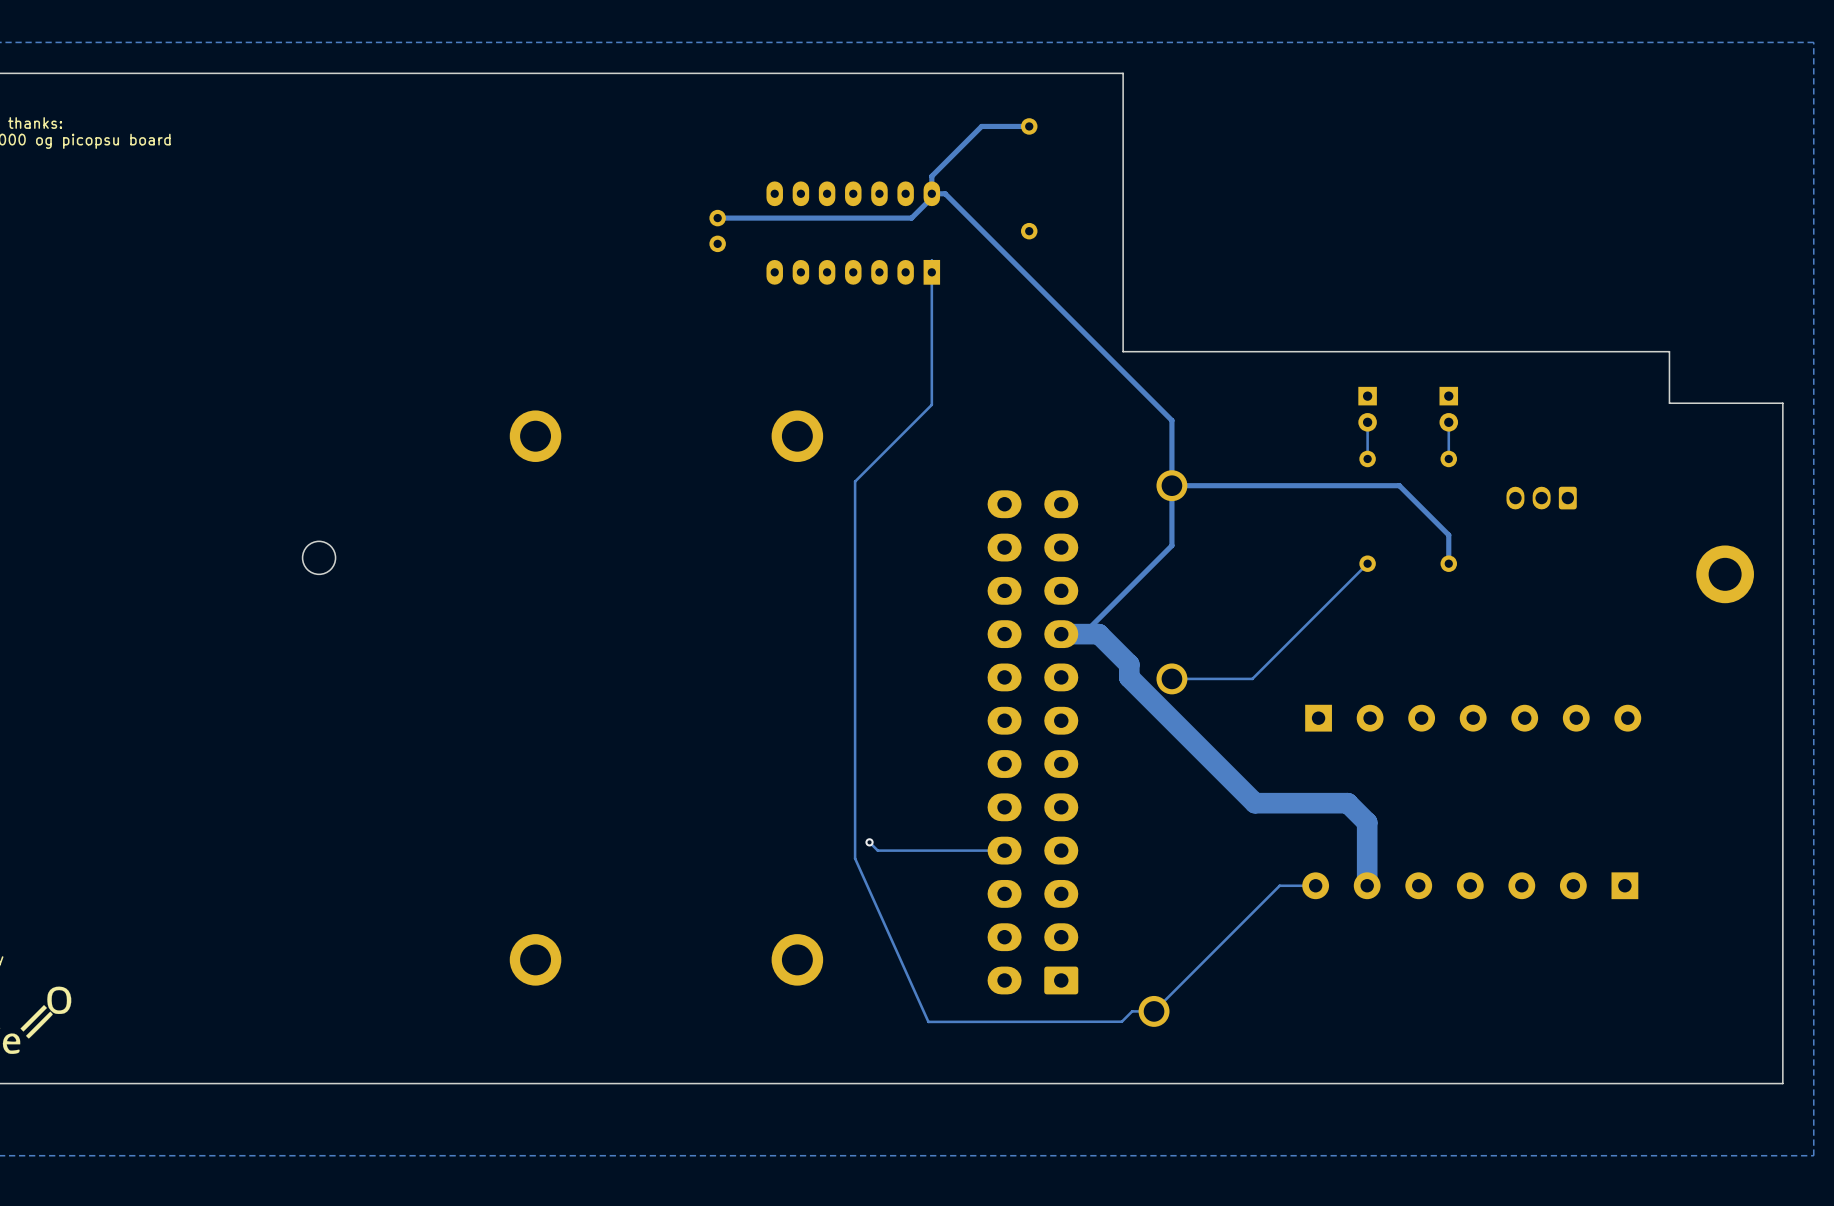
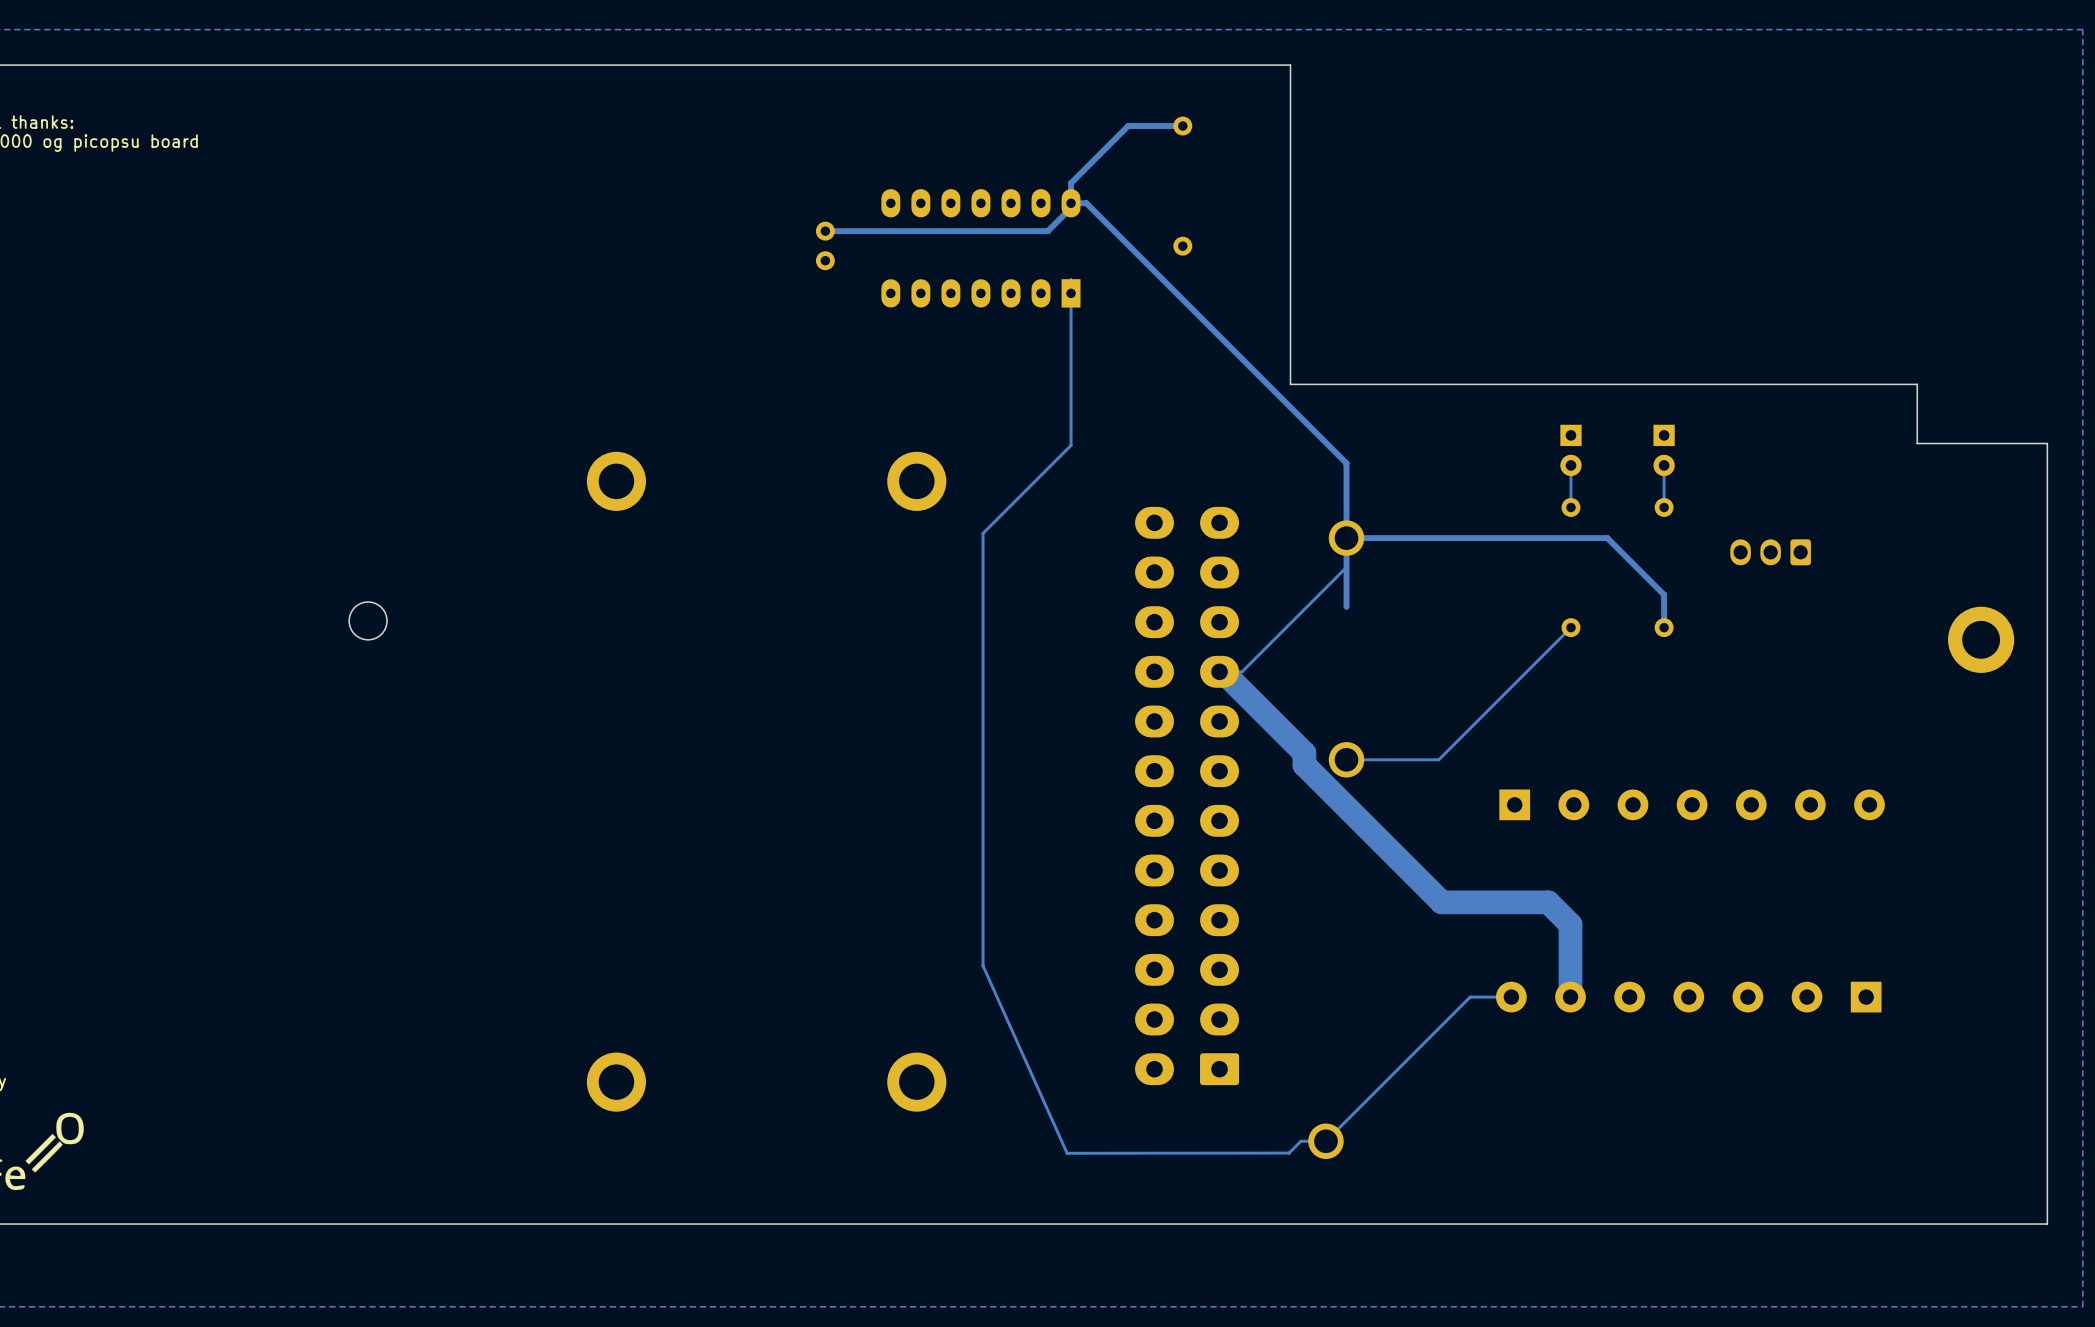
track: (1171, 545) (1083, 634) (1061, 634) (1098, 634) (1129, 664) (1129, 677) (1135, 683) -> (1346, 538) (1346, 567) (1242, 671) (1219, 671) (1223, 671) (1304, 753) (1304, 765)
part position: (1032, 742) -> (1187, 796)
track: (869, 842) (877, 850) (1004, 850) -> none
via: (869, 842) -> none

